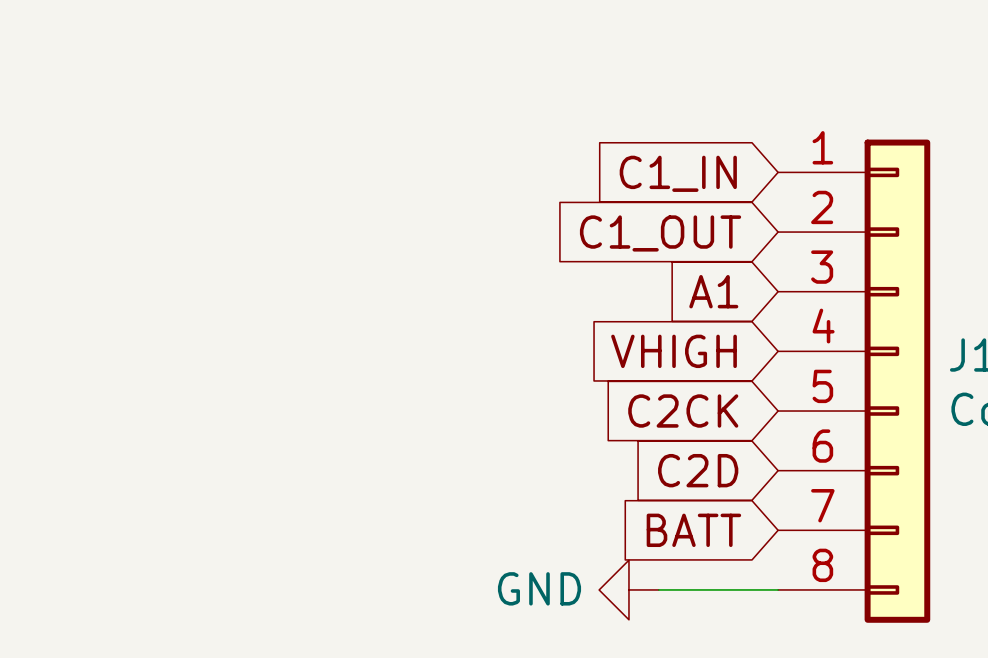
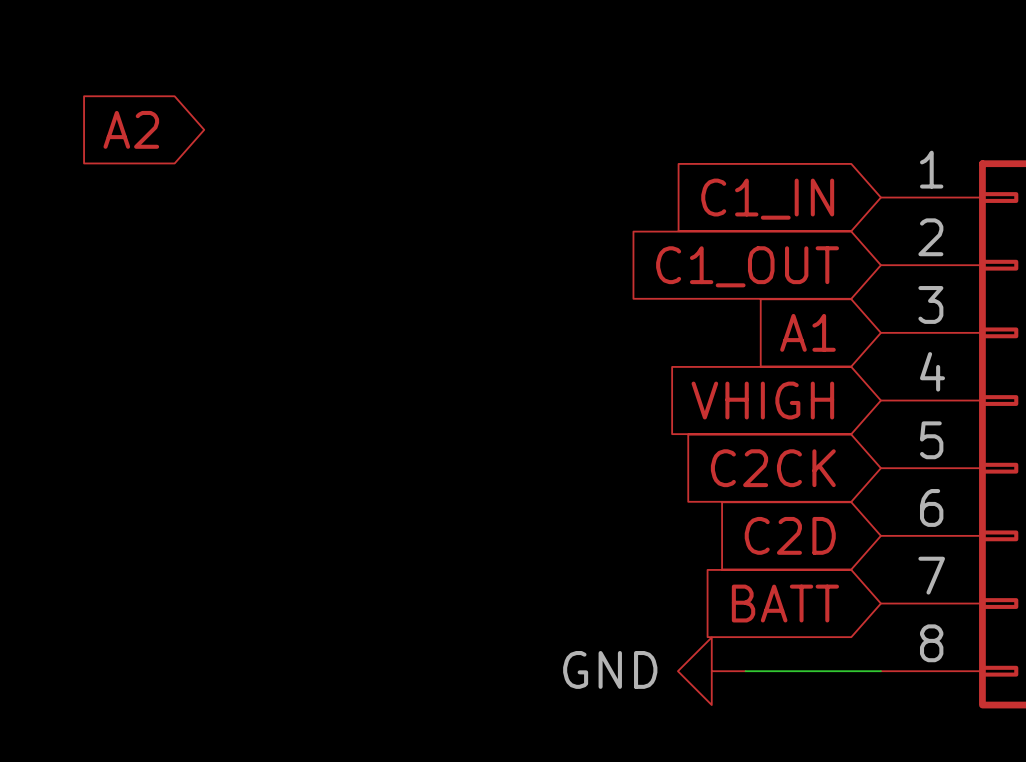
global label: none -> A2 (131, 129)

